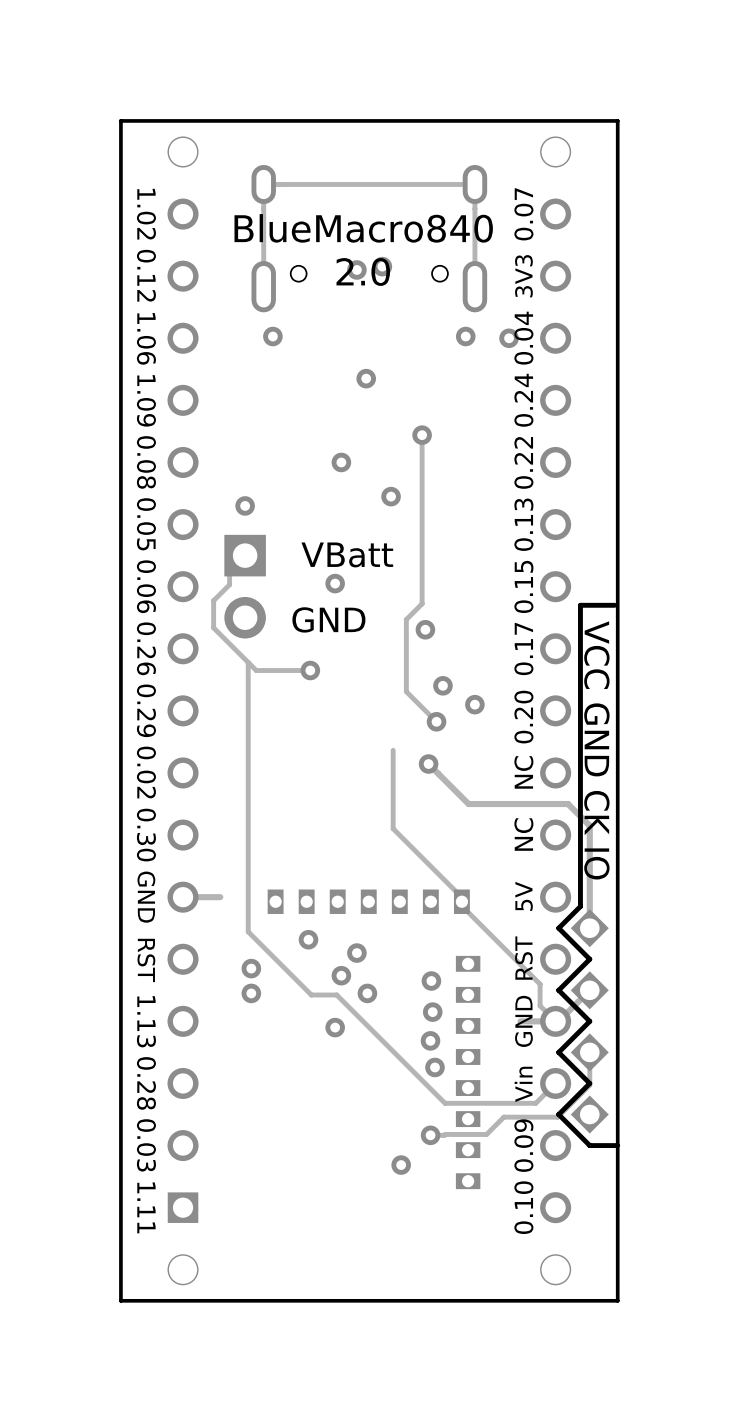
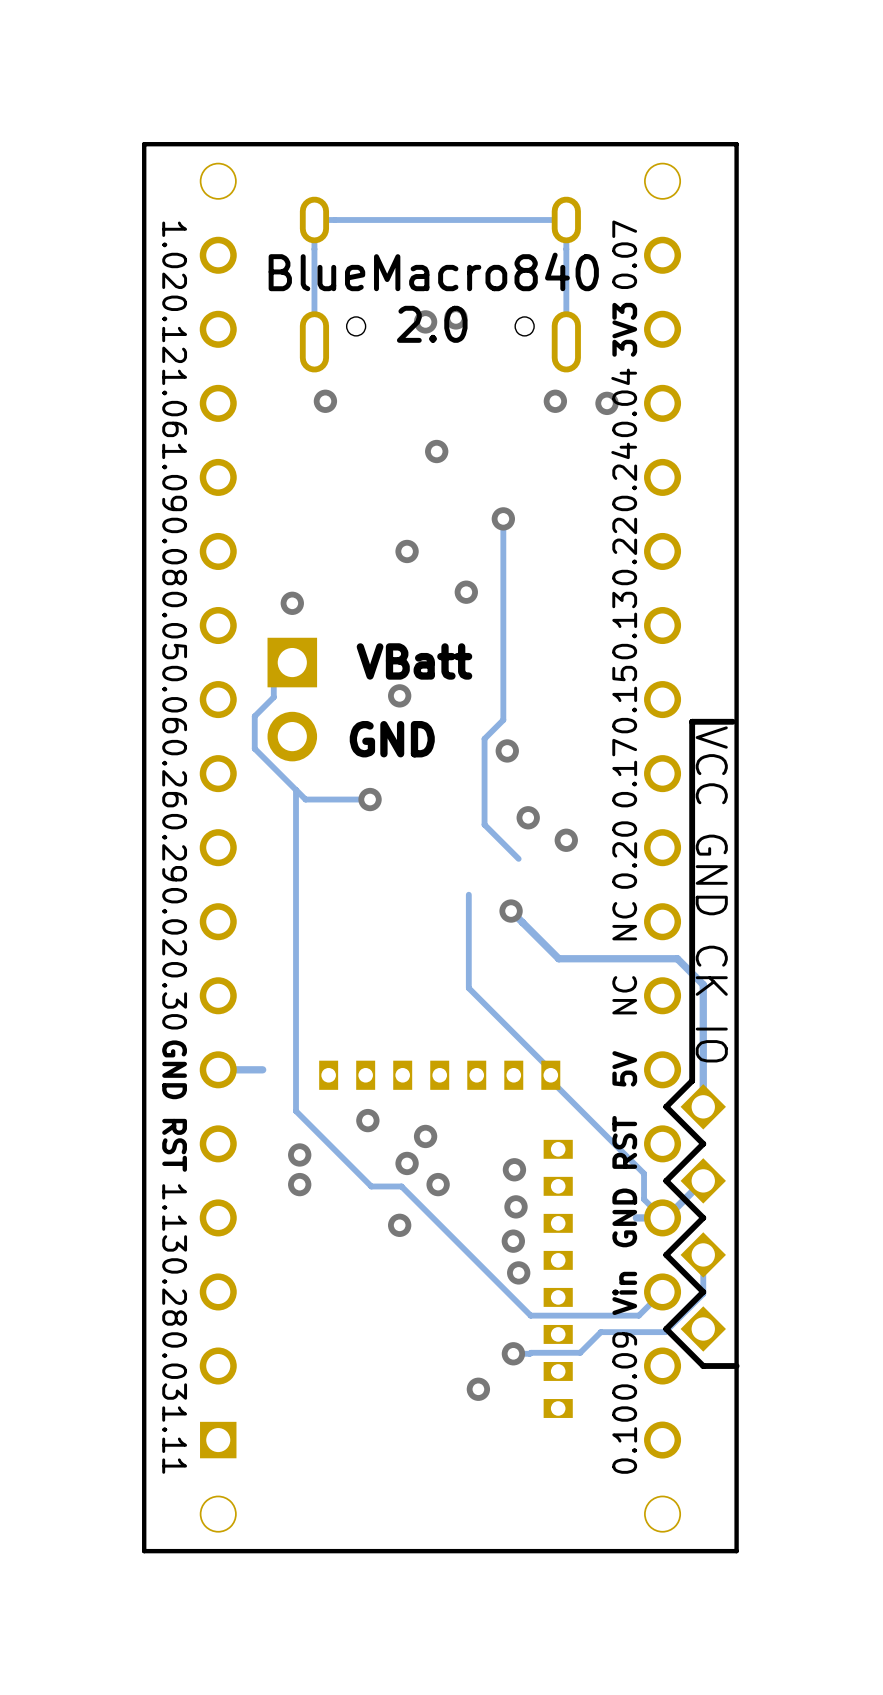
via: (436, 721) -> none
track: (533, 1021) (520, 1021) -> none

